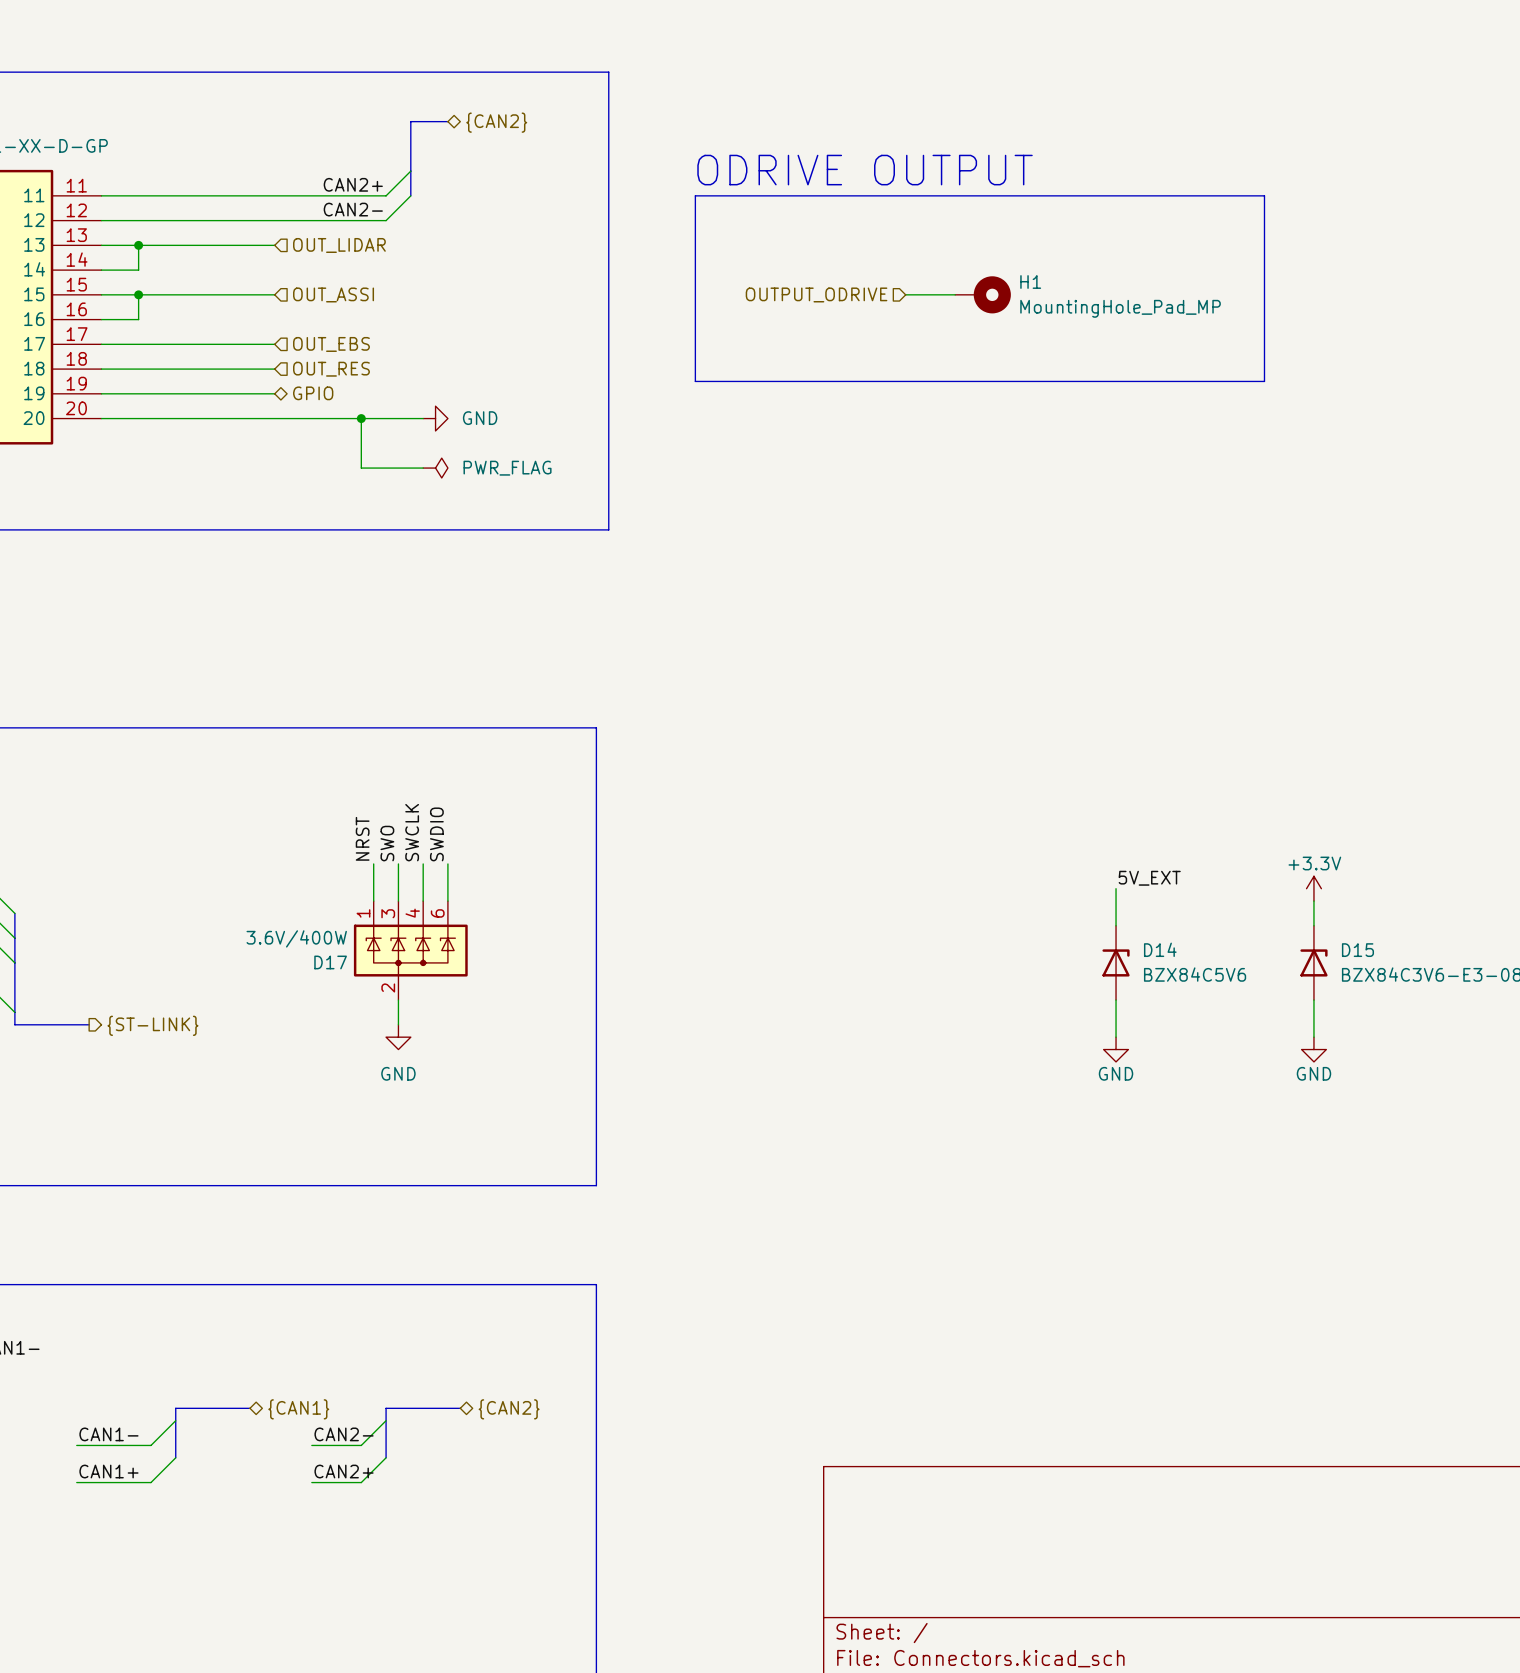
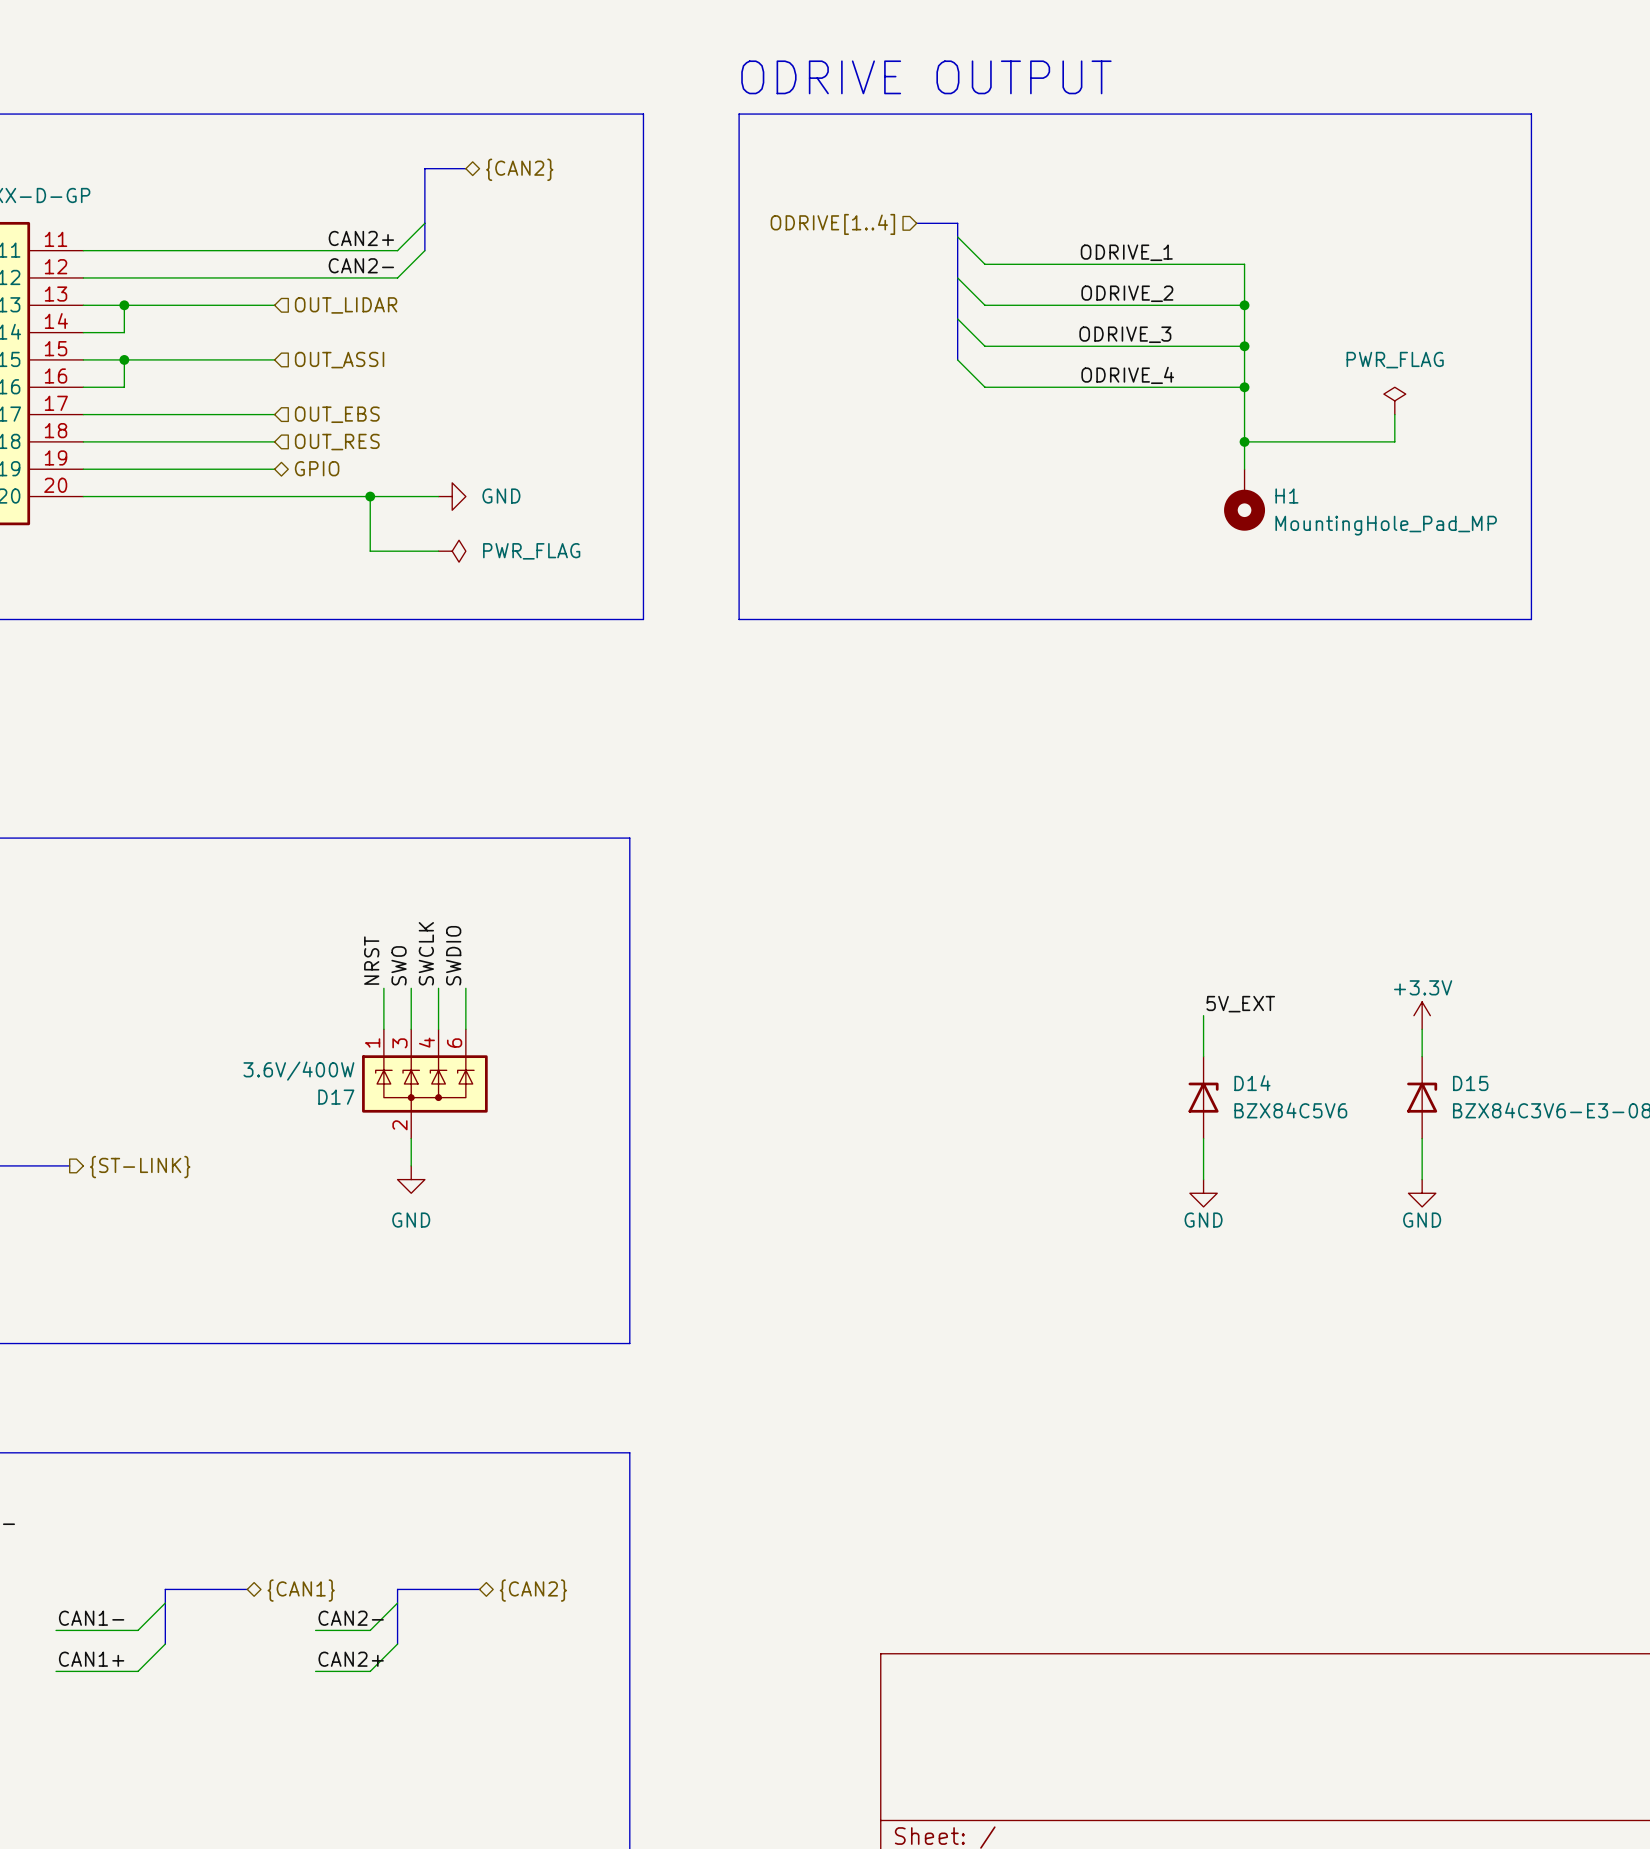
text position: ODRIVE OUTPUT (865, 170) -> ODRIVE OUTPUT (926, 77)
bus: none -> (916, 223) (957, 223) (957, 359)
hierarchical label: none -> ODRIVE[1..4] (832, 224)
wire: none -> (957, 236) (984, 264) (1244, 264) (1244, 469)
line: (695, 195) (1264, 195) (1264, 381) (695, 381) -> (739, 250) (739, 114) (1531, 114) (1531, 619) (739, 619) (739, 455)
label: none -> ODRIVE_1 (1126, 252)
wire: none -> (957, 277) (984, 305) (1244, 305)
label: none -> ODRIVE_2 (1127, 293)
junction: none -> (1244, 305)
wire: none -> (957, 318) (984, 346) (1244, 346)
label: none -> ODRIVE_3 (1125, 334)
junction: none -> (1244, 346)
hierarchical label: OUTPUT_ODRIVE (816, 294) -> none
wire: none -> (957, 359) (984, 387) (1244, 387)
wire: (905, 294) (955, 294) -> none
H1 position: (983, 294) -> (1244, 499)
H1 rotation: 0° (992, 294) -> 90° clockwise (1244, 510)
label: none -> ODRIVE_4 (1127, 375)
junction: none -> (1244, 387)
power symbol: none -> PWR_FLAG (1394, 400)
wire: none -> (1394, 414) (1394, 441) (1244, 441)
junction: none -> (1244, 441)

